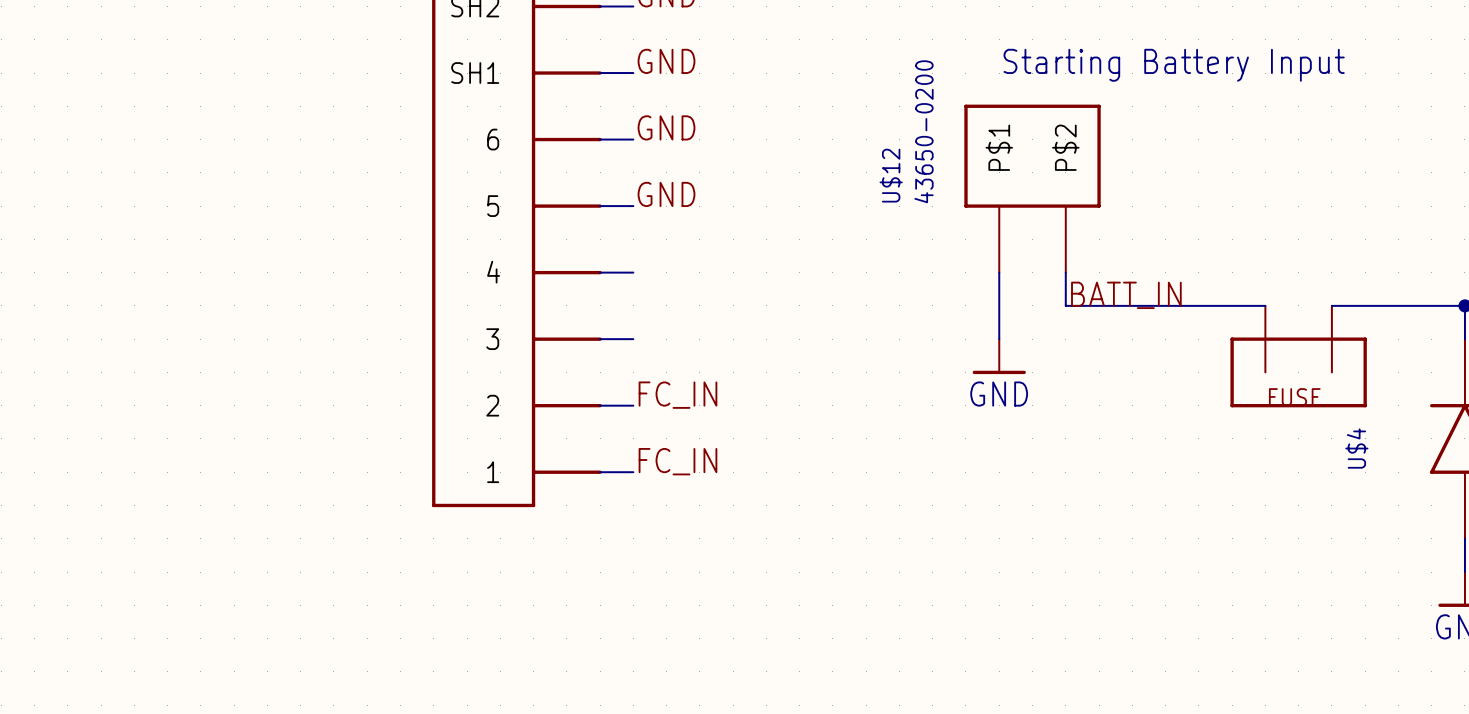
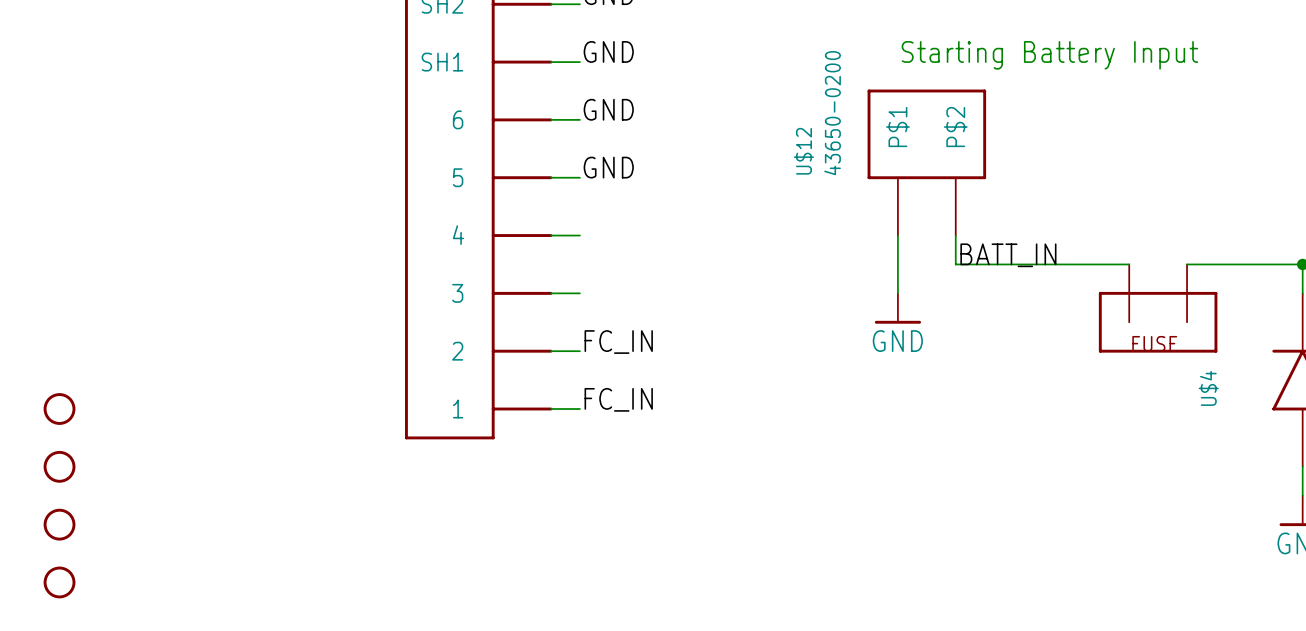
part: none -> (59, 409)
part: none -> (59, 466)
part: none -> (59, 524)
part: none -> (59, 582)

